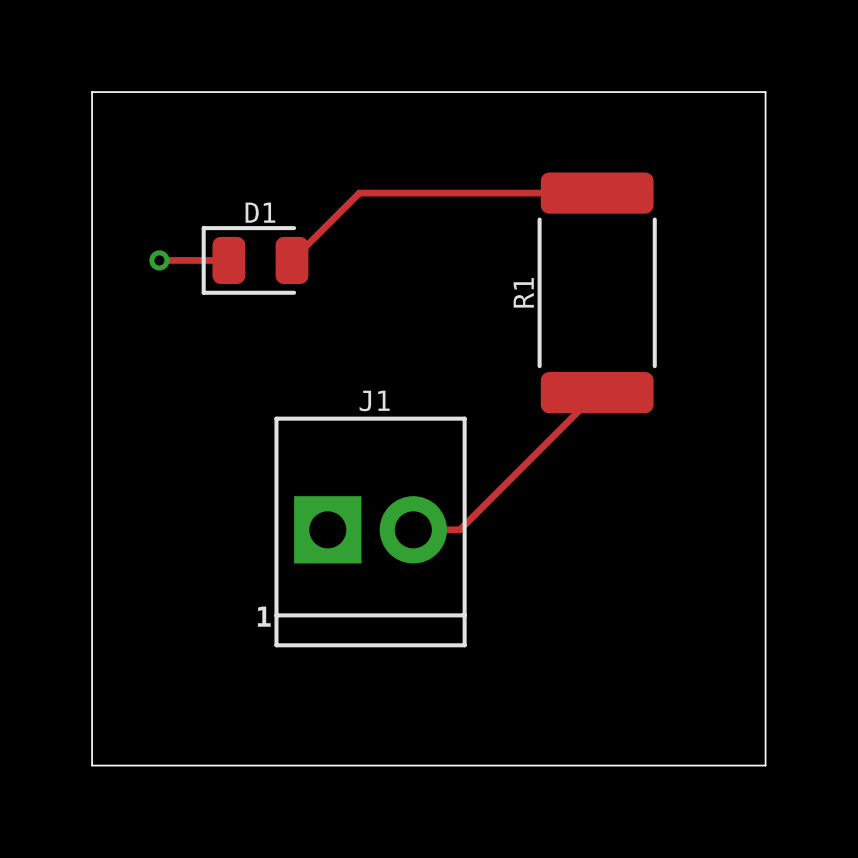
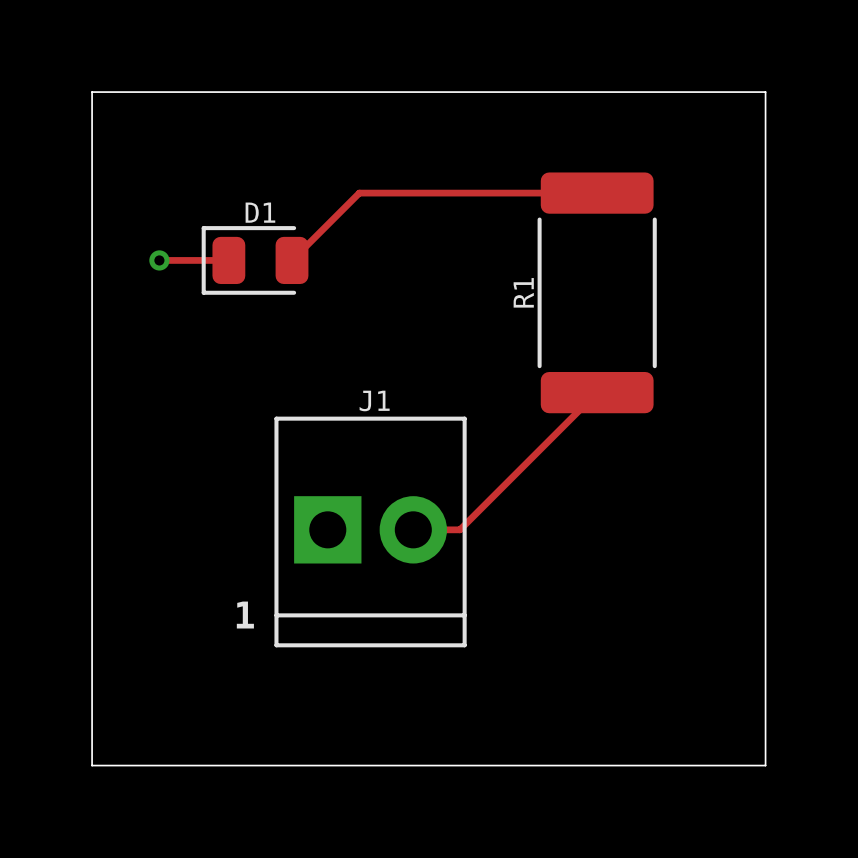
J1 text position: 1 (264, 616) -> 1 (245, 615)

